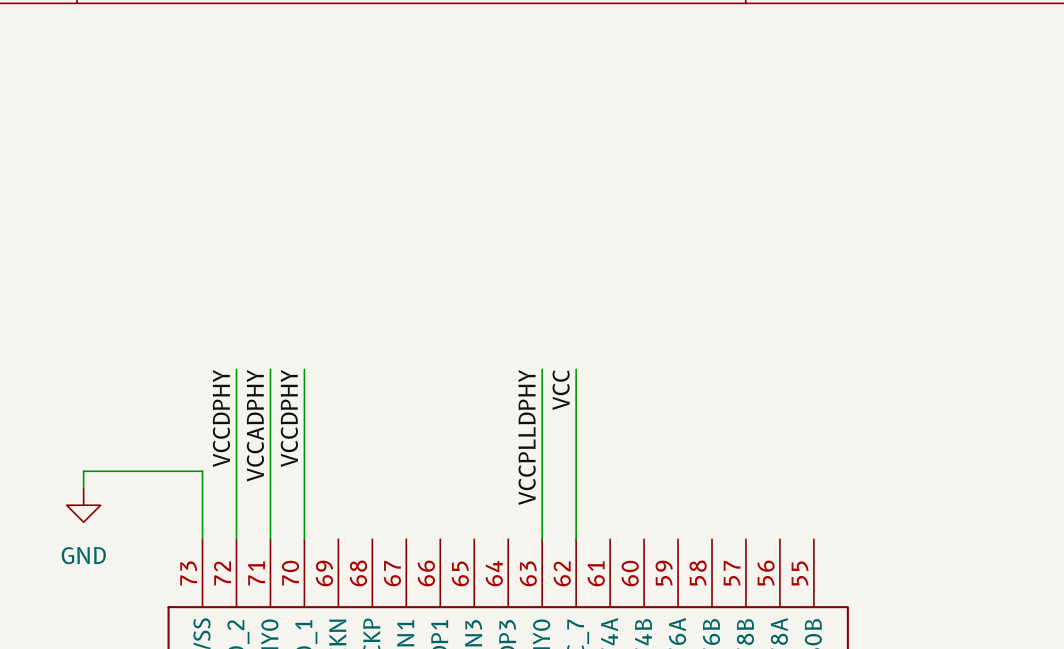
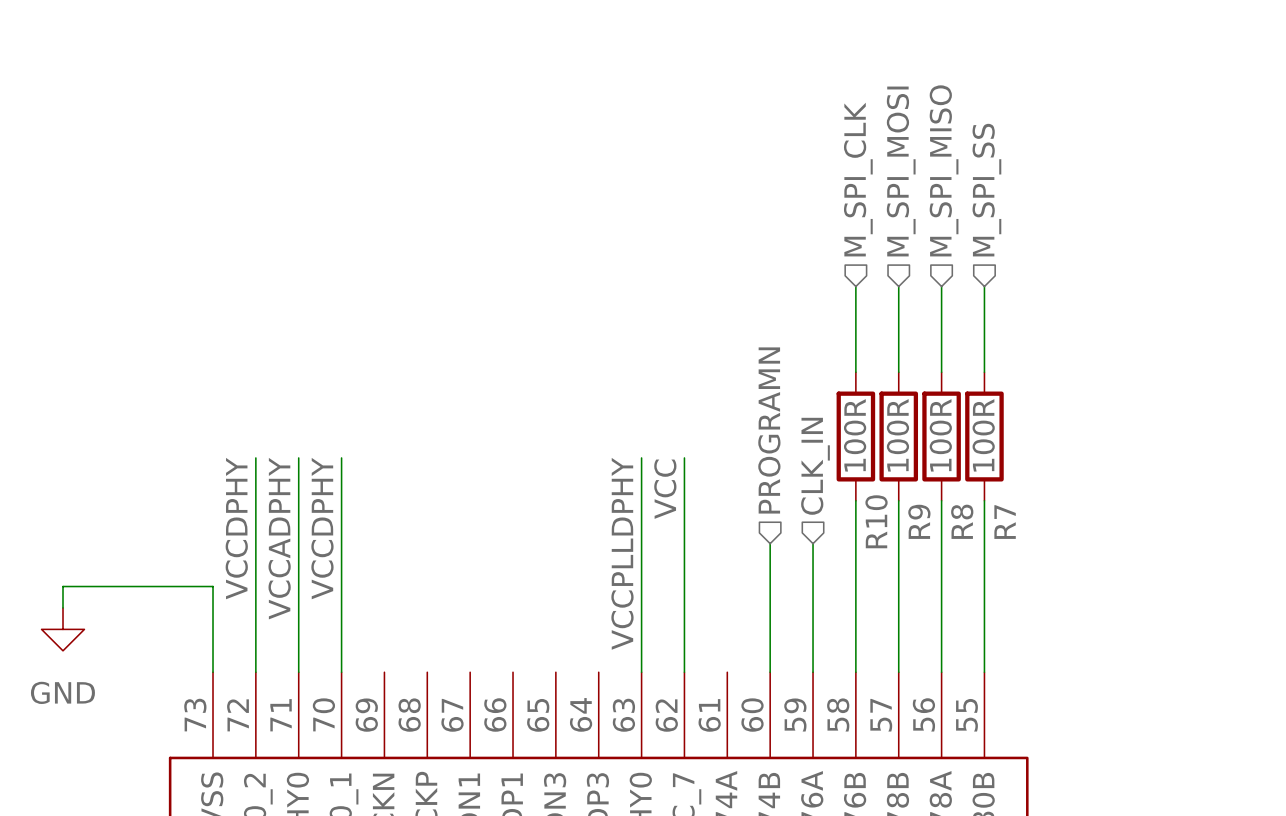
hierarchical label: none -> M_SPI_MISO (944, 170)
hierarchical label: none -> M_SPI_MOSI (901, 171)
hierarchical label: none -> M_SPI_CLK (858, 179)
hierarchical label: none -> M_SPI_SS (986, 190)
wire: none -> (855, 286) (855, 372)
wire: none -> (898, 286) (898, 372)
wire: none -> (941, 286) (941, 372)
wire: none -> (984, 286) (984, 372)
hierarchical label: none -> PROGRAMN (769, 430)
R10: none -> 100R (855, 436)
R9: none -> 100R (898, 436)
R8: none -> 100R (941, 436)
R7: none -> 100R (984, 436)
hierarchical label: none -> CLK_IN (815, 466)
wire: none -> (855, 500) (855, 672)
wire: none -> (898, 500) (898, 672)
wire: none -> (941, 500) (941, 672)
wire: none -> (984, 500) (984, 672)
wire: none -> (770, 543) (770, 672)
wire: none -> (813, 543) (813, 672)

